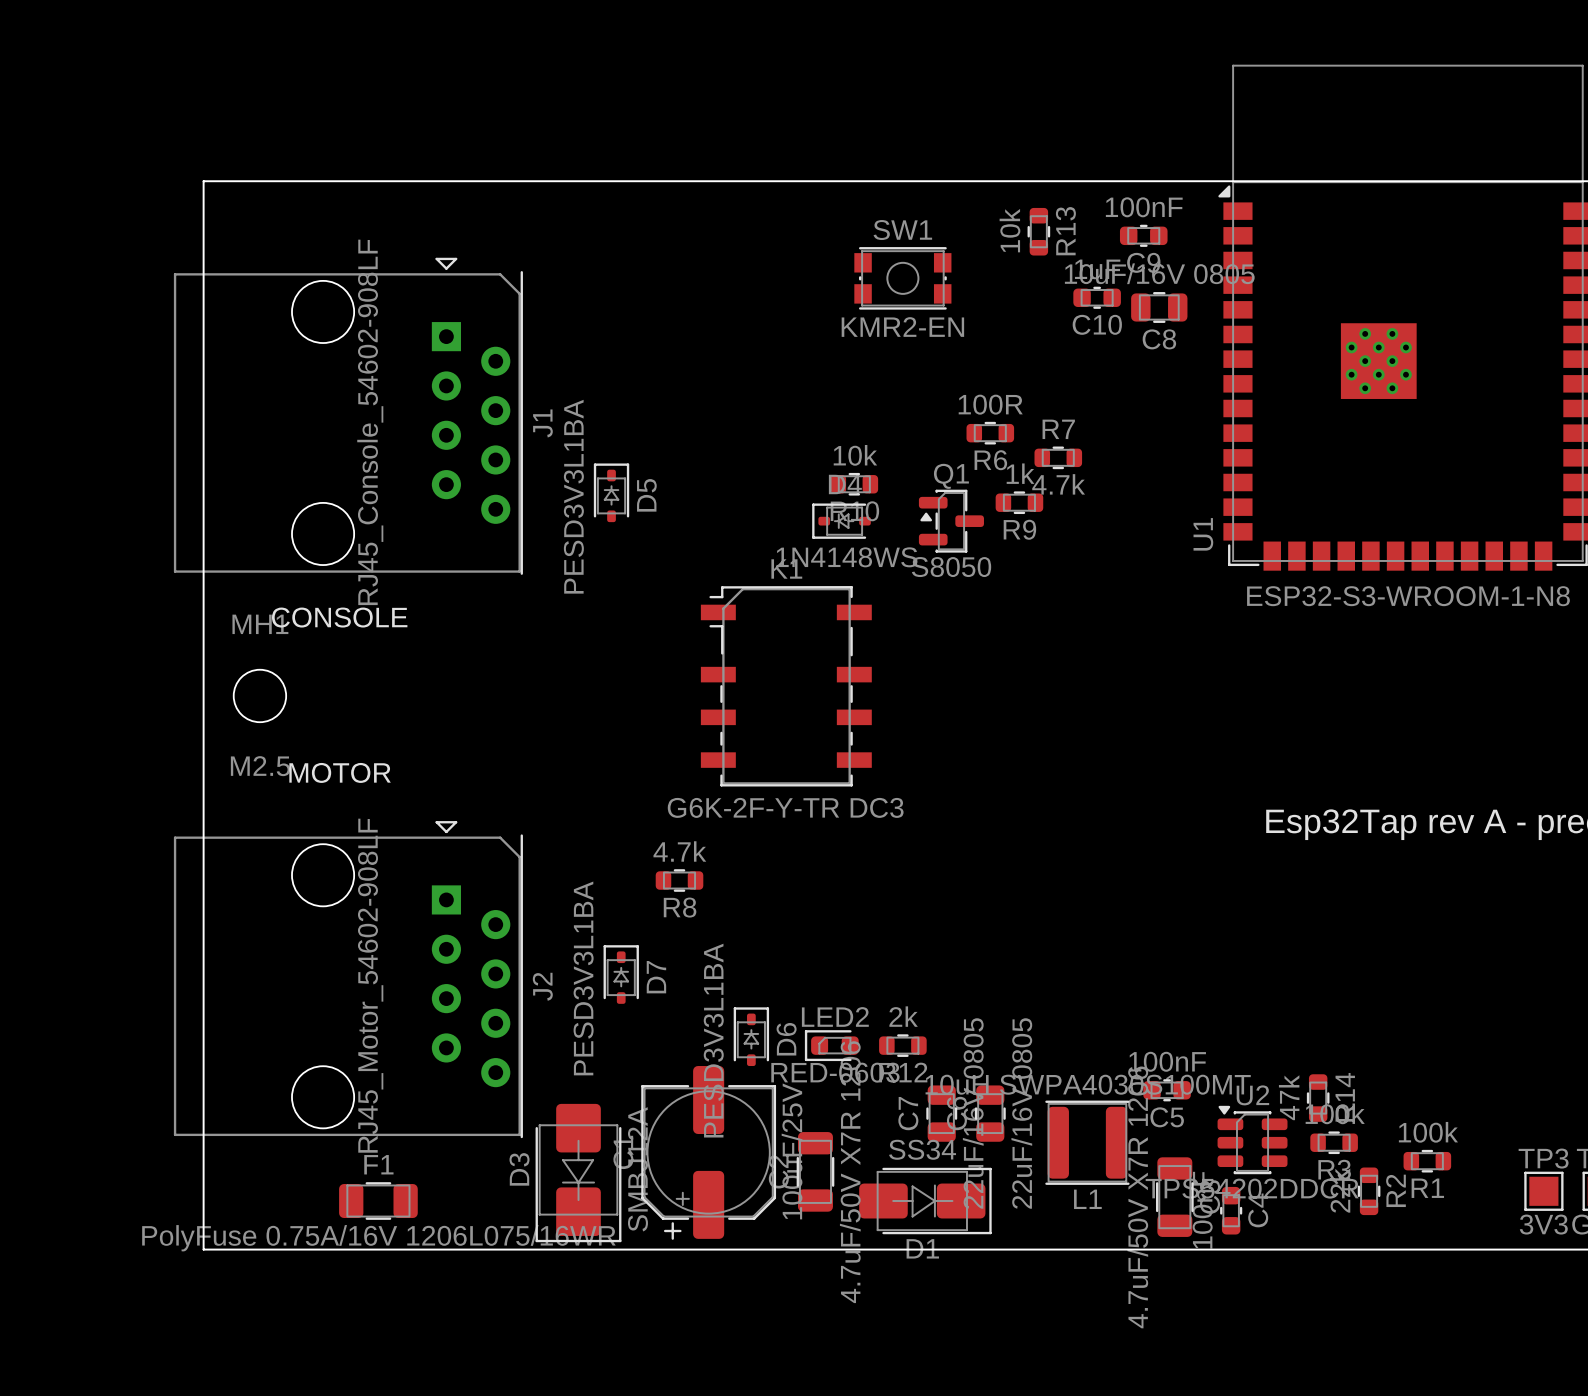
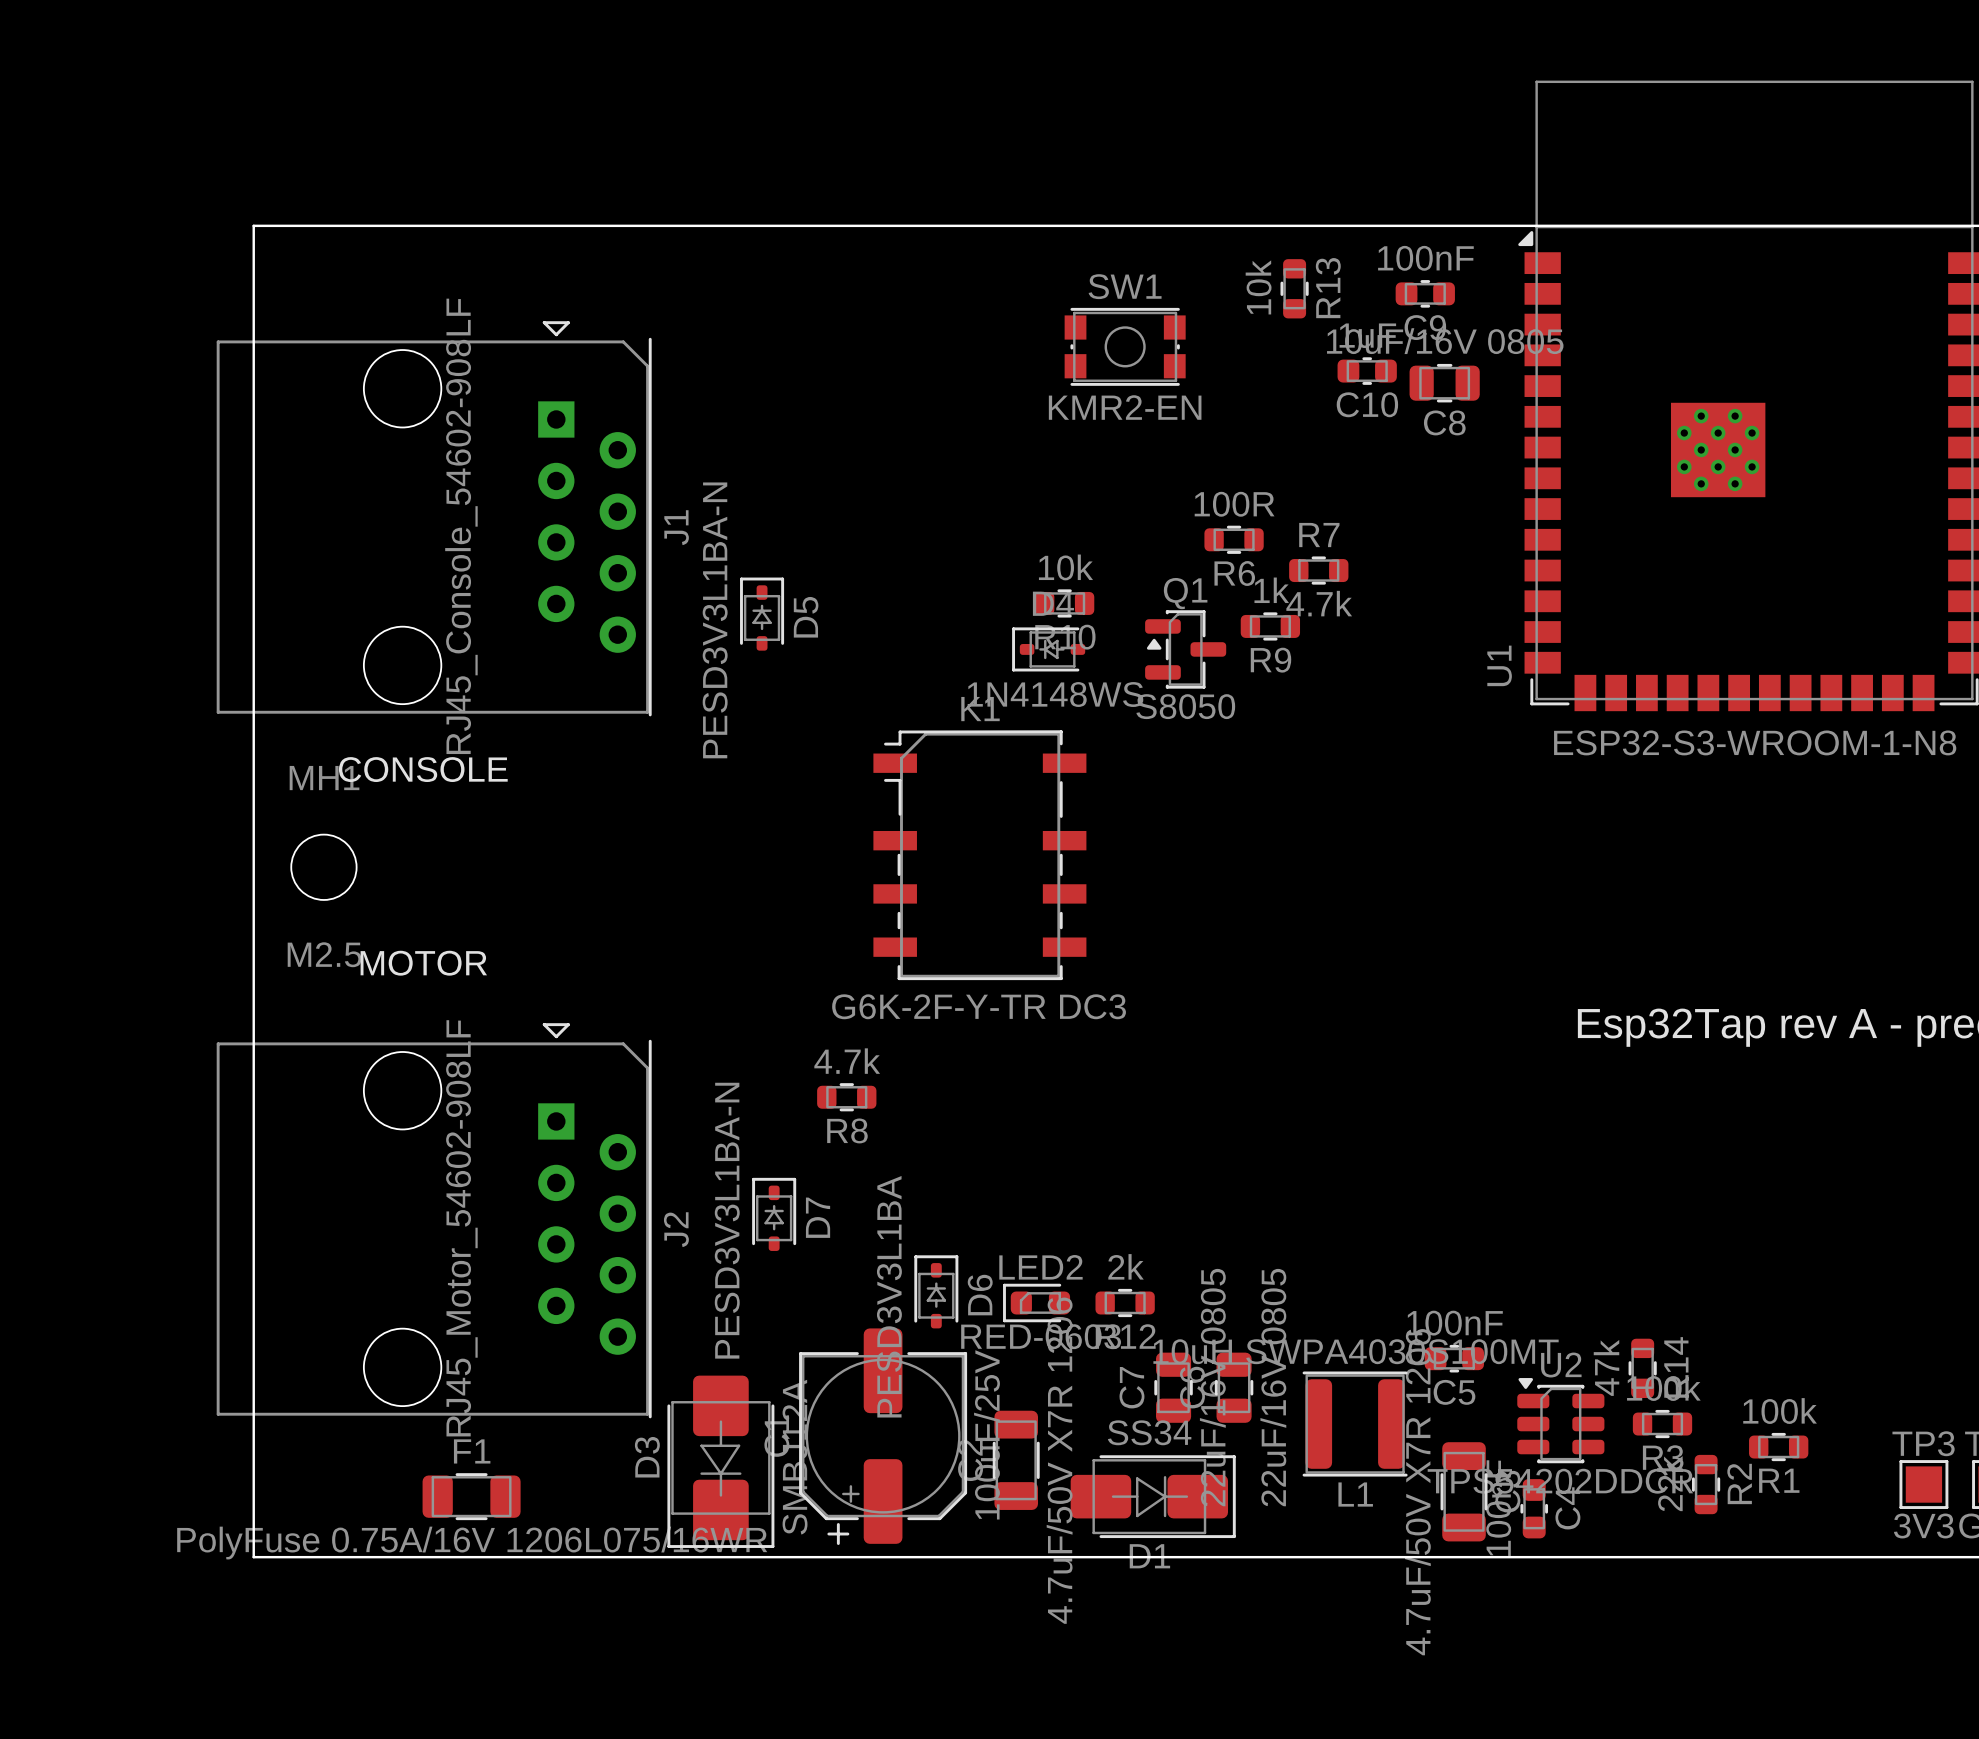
D5 value: PESD3V3L1BA (573, 496) -> PESD3V3L1BA-N (715, 620)
D7 value: PESD3V3L1BA (583, 978) -> PESD3V3L1BA-N (727, 1220)

